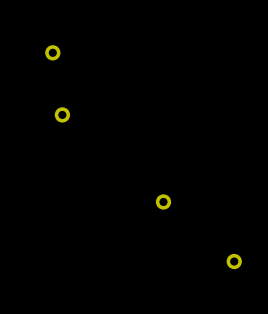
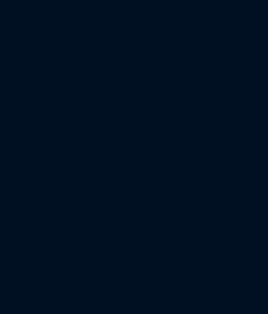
part: (52, 52) -> none
part: (62, 114) -> none
part: (163, 201) -> none
part: (234, 261) -> none

